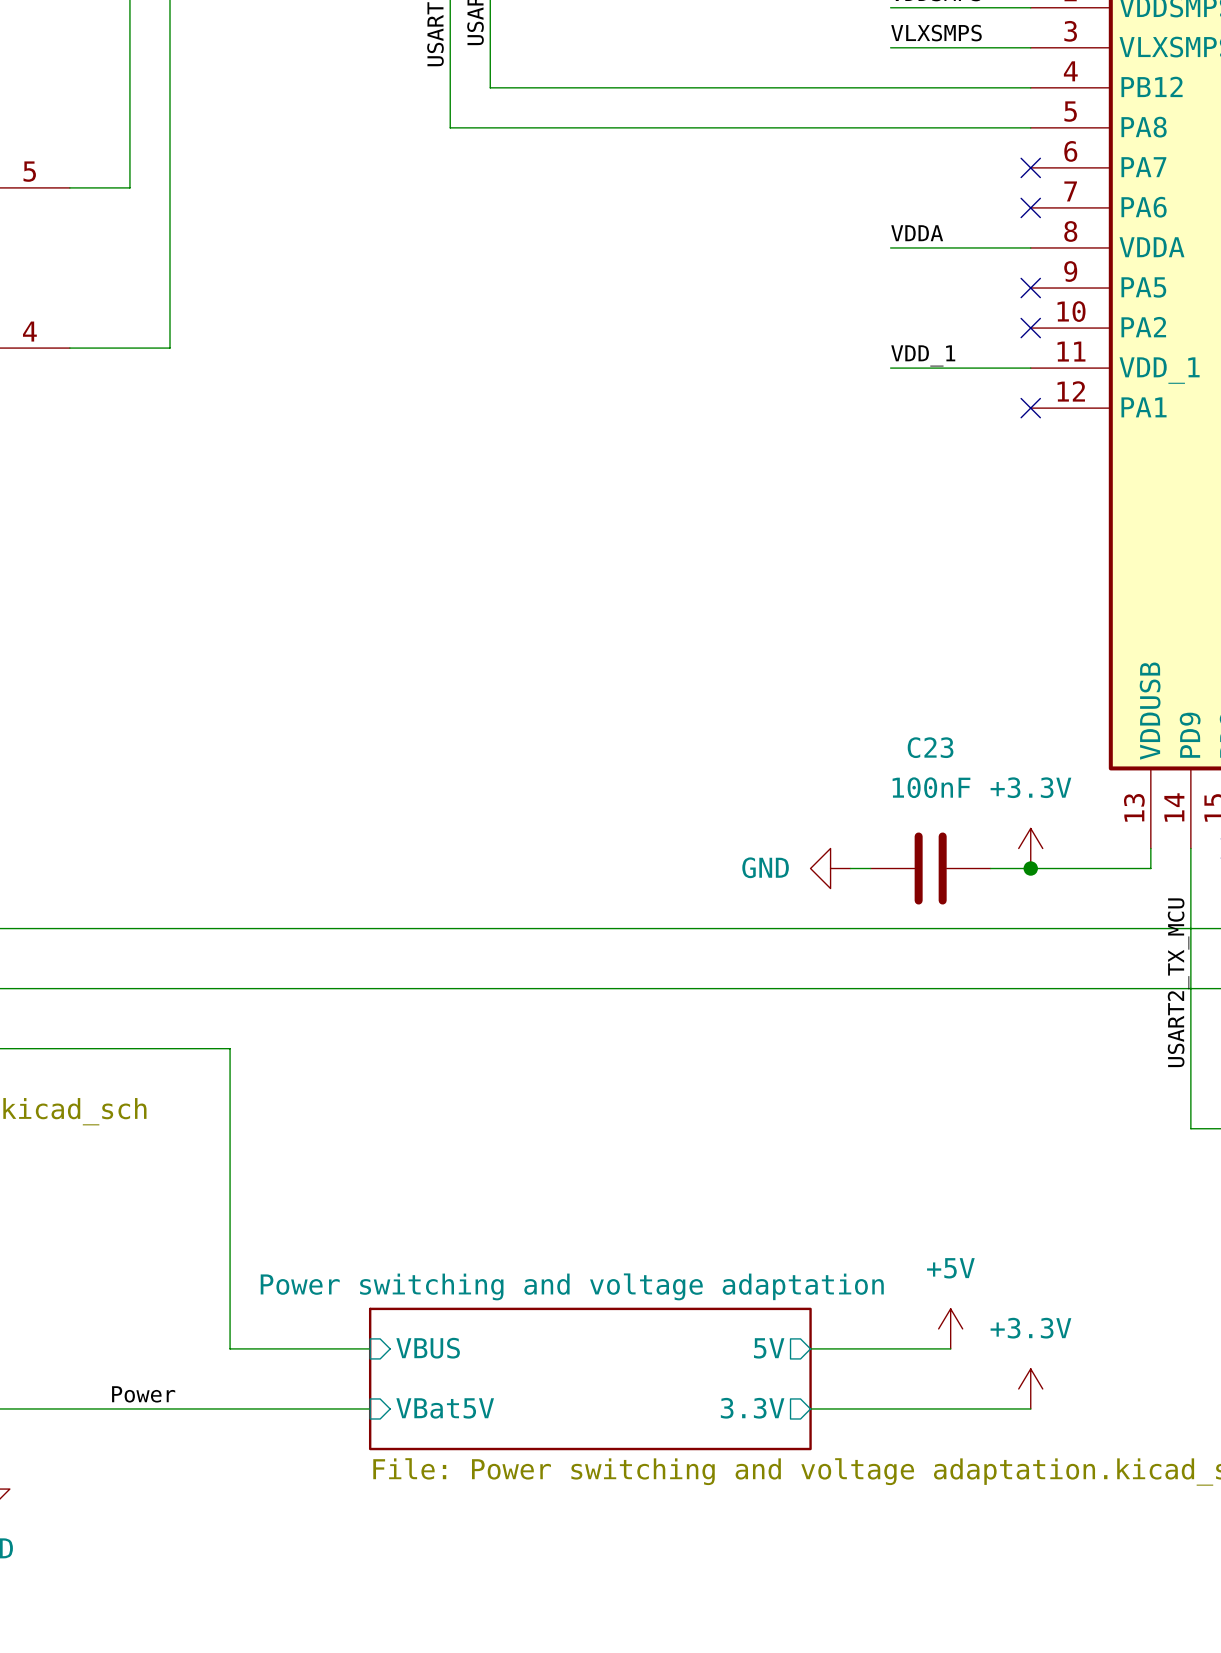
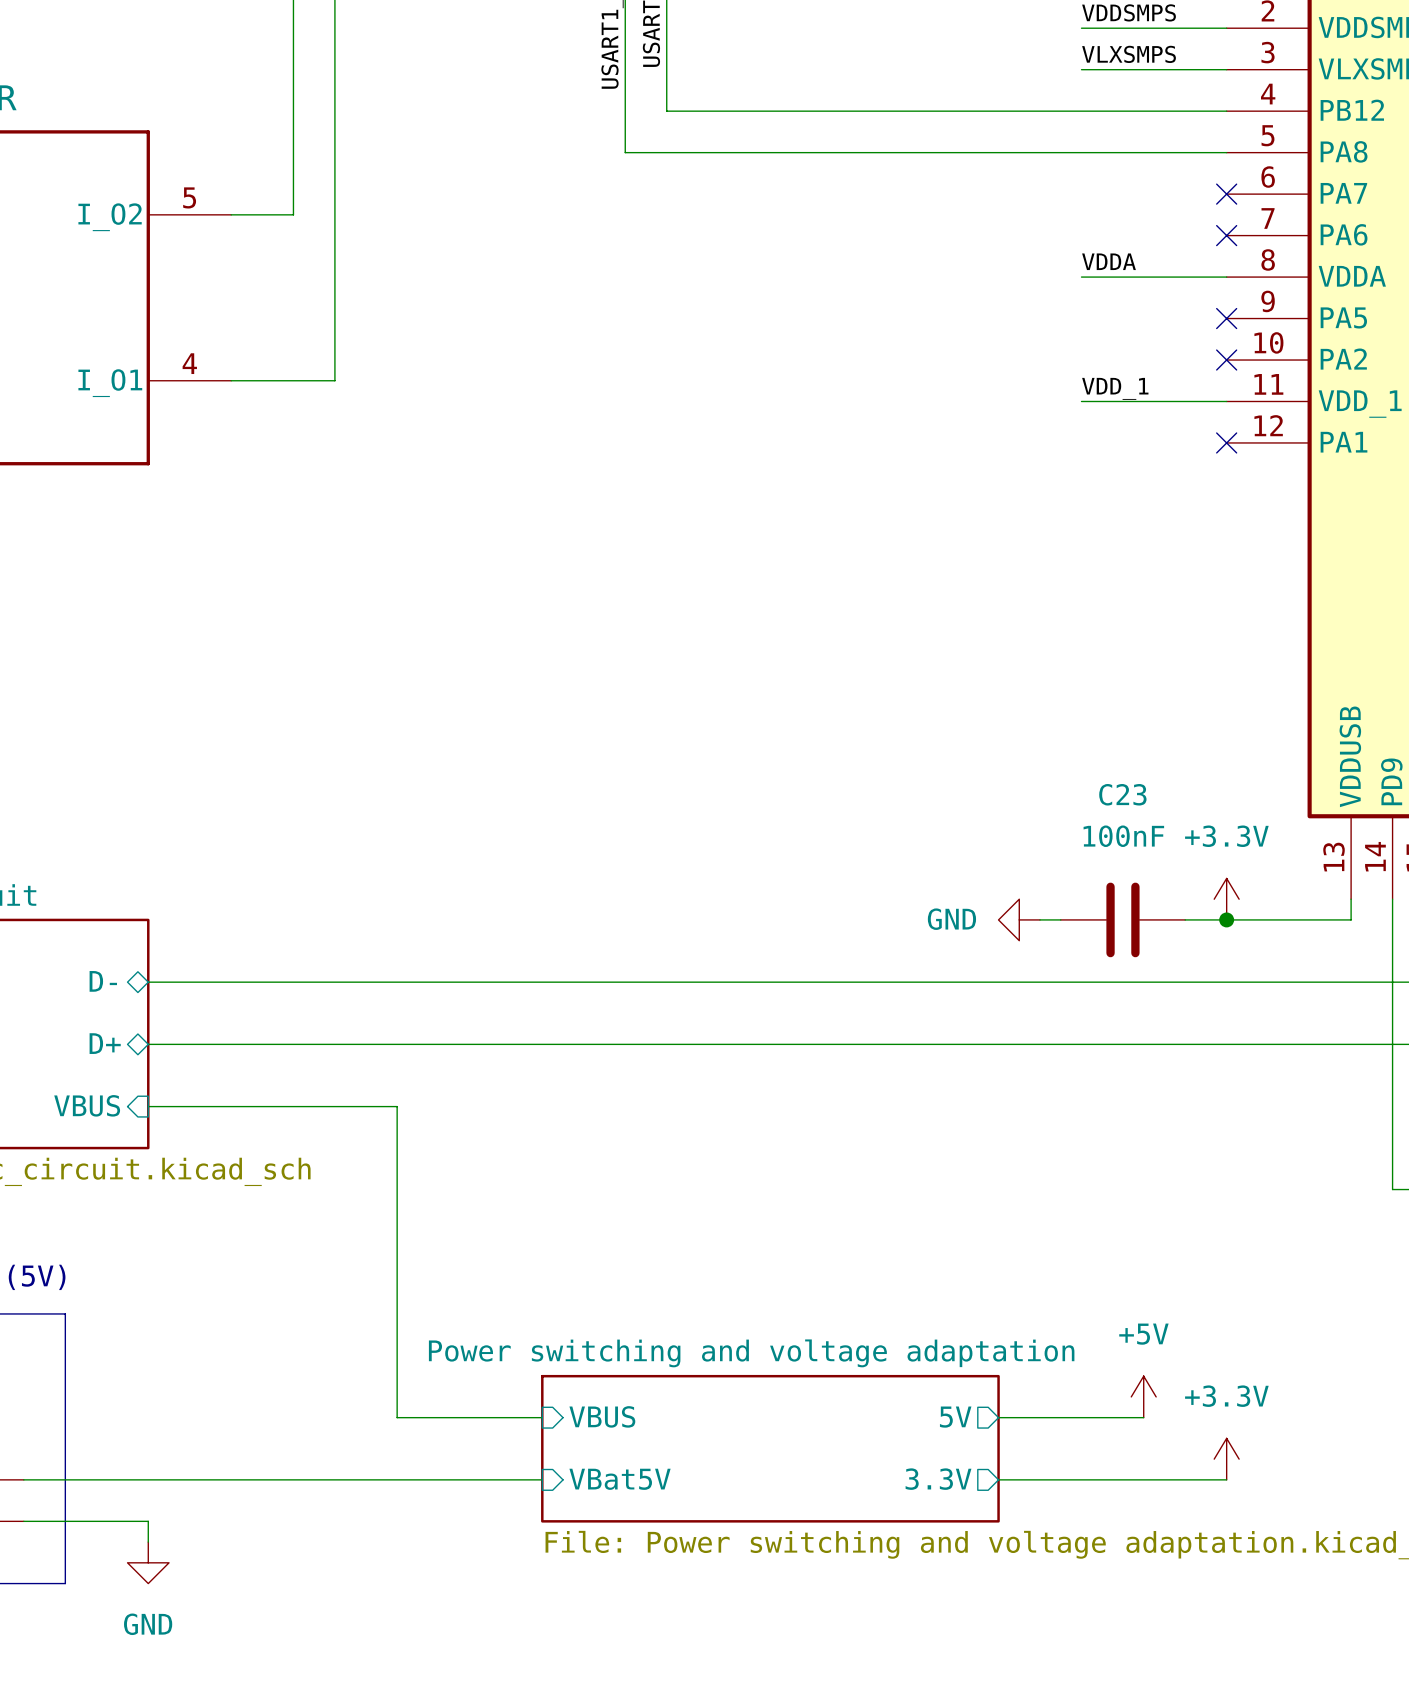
label: USART2_TX_MCU (1178, 982) -> none
label: Power (143, 1394) -> none

